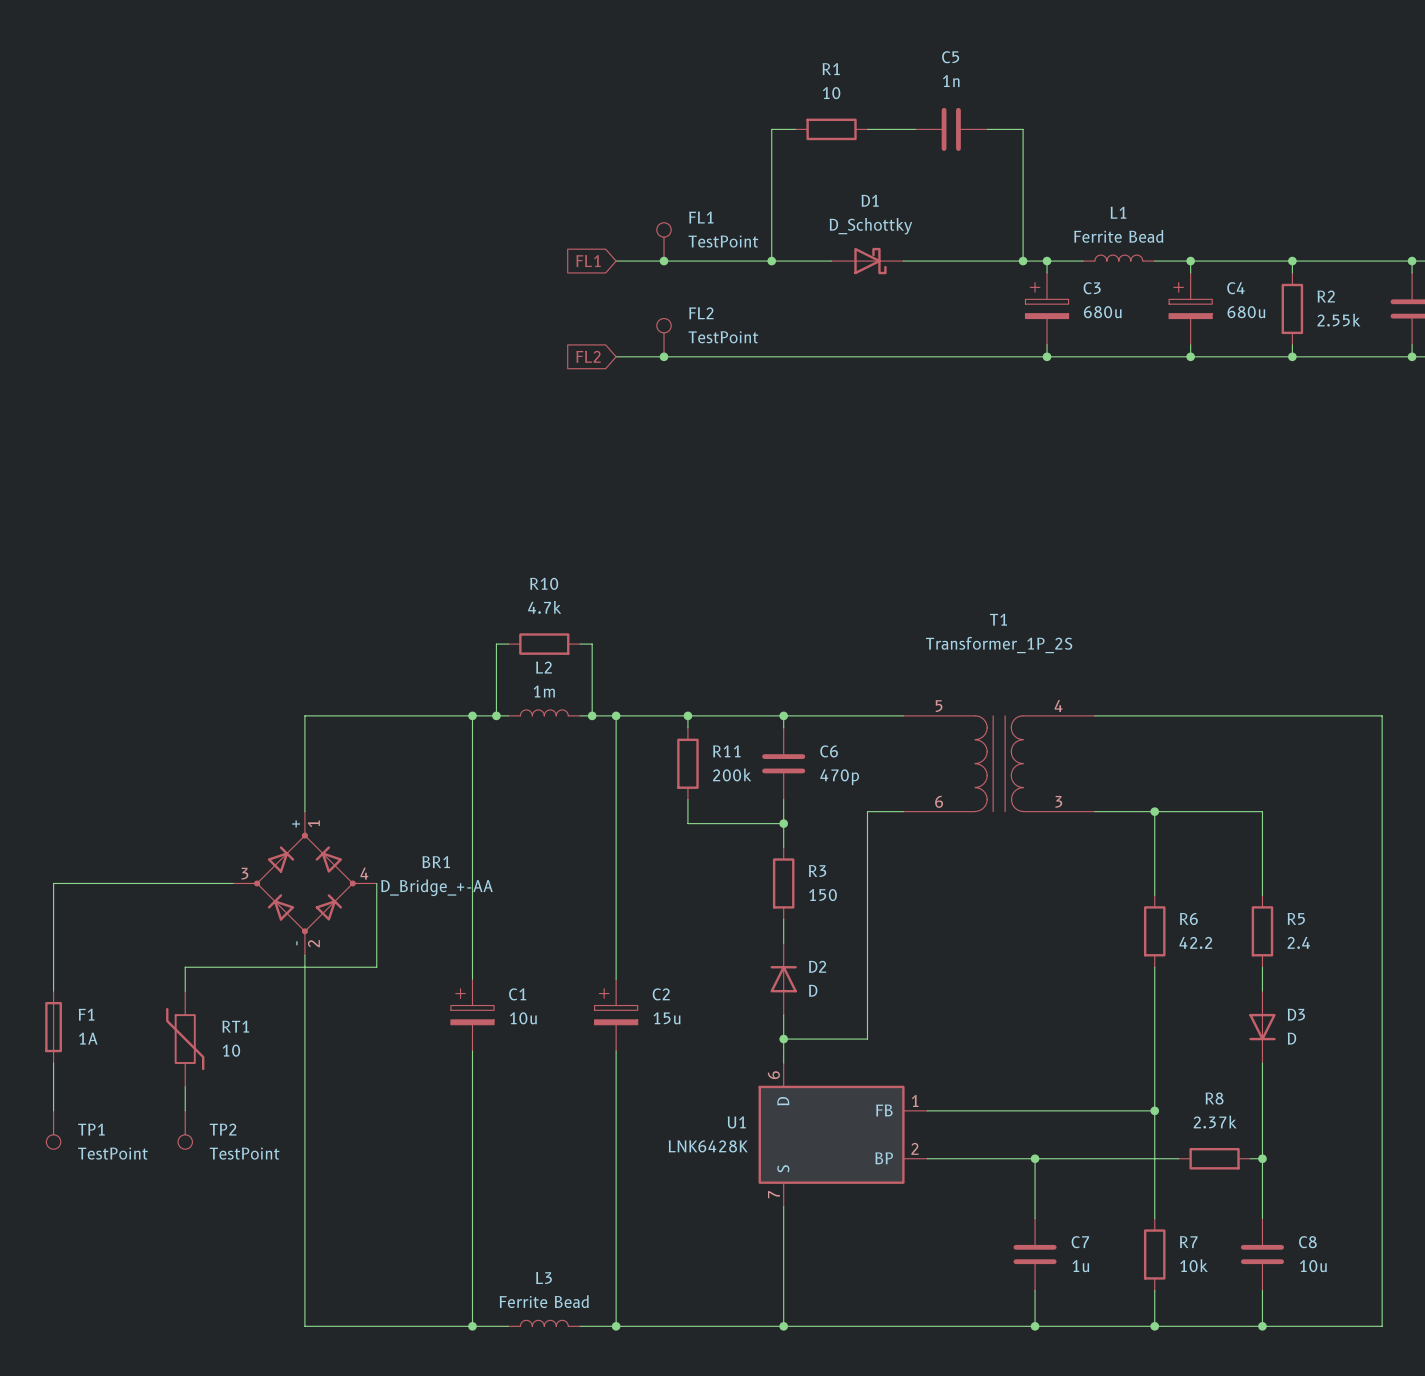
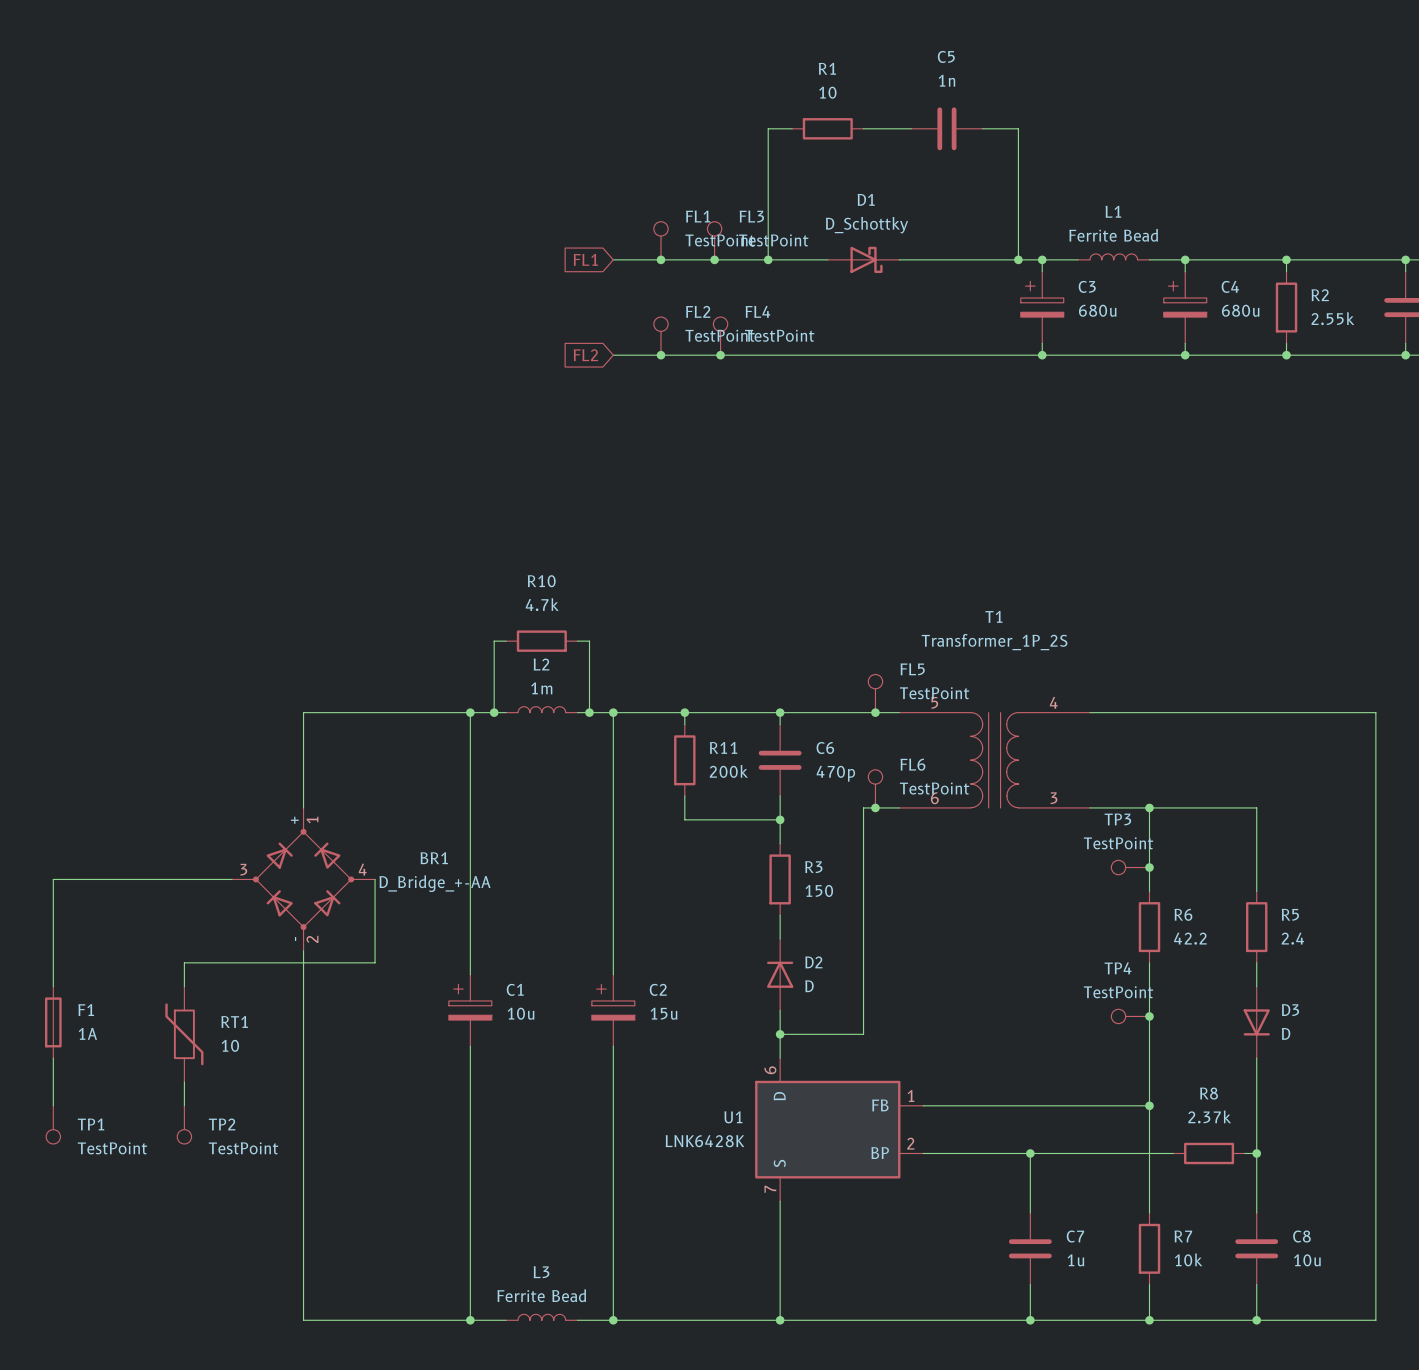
FL3: none -> TestPoint (714, 240)
junction: none -> (714, 259)
FL4: none -> TestPoint (720, 336)
junction: none -> (720, 355)
FL5: none -> TestPoint (875, 693)
junction: none -> (875, 712)
FL6: none -> TestPoint (875, 788)
junction: none -> (875, 807)
TP3: none -> TestPoint (1130, 867)
junction: none -> (1149, 867)
TP4: none -> TestPoint (1130, 1016)
junction: none -> (1149, 1016)

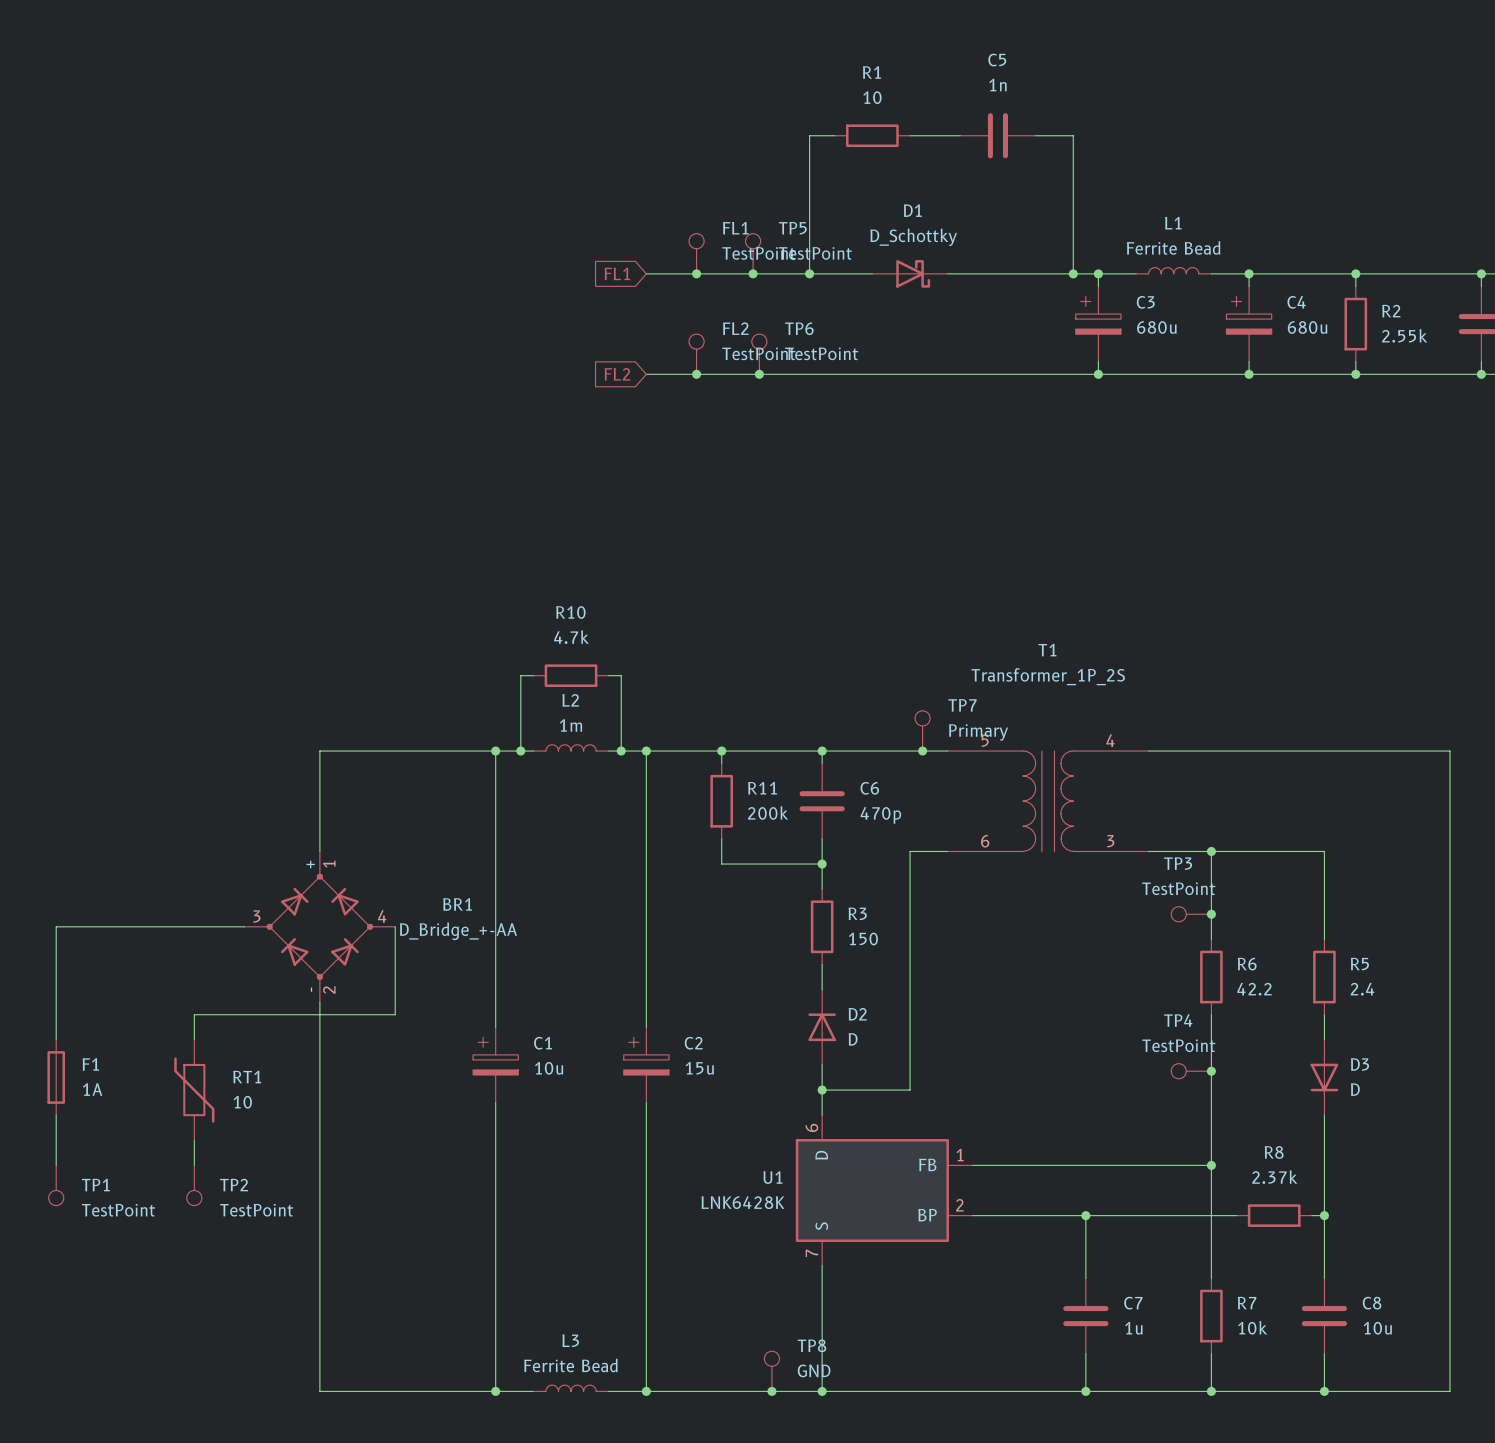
FL3 name: FL3 (751, 216) -> TP5 (792, 228)
FL4 name: FL4 (757, 311) -> TP6 (799, 328)
FL5 name: FL5 (912, 669) -> TP7 (962, 705)
FL5 value: TestPoint (934, 693) -> Primary (978, 732)
FL6: TestPoint (875, 788) -> none
junction: (875, 807) -> none
TP8: none -> GND (771, 1371)
junction: none -> (771, 1391)

